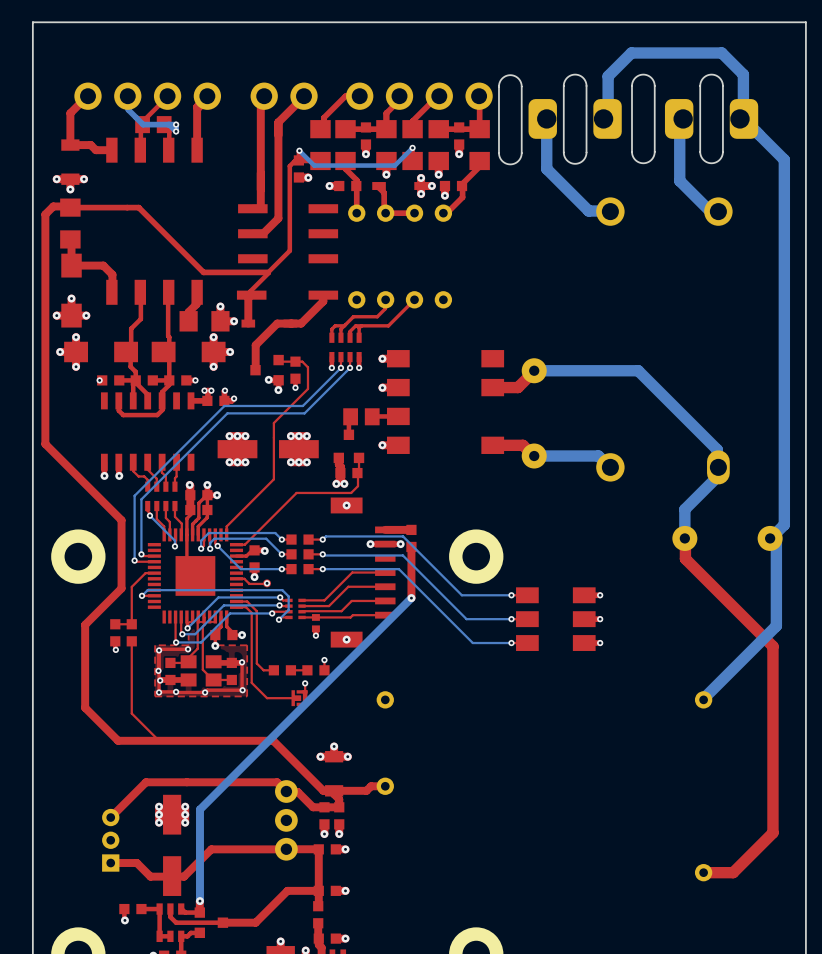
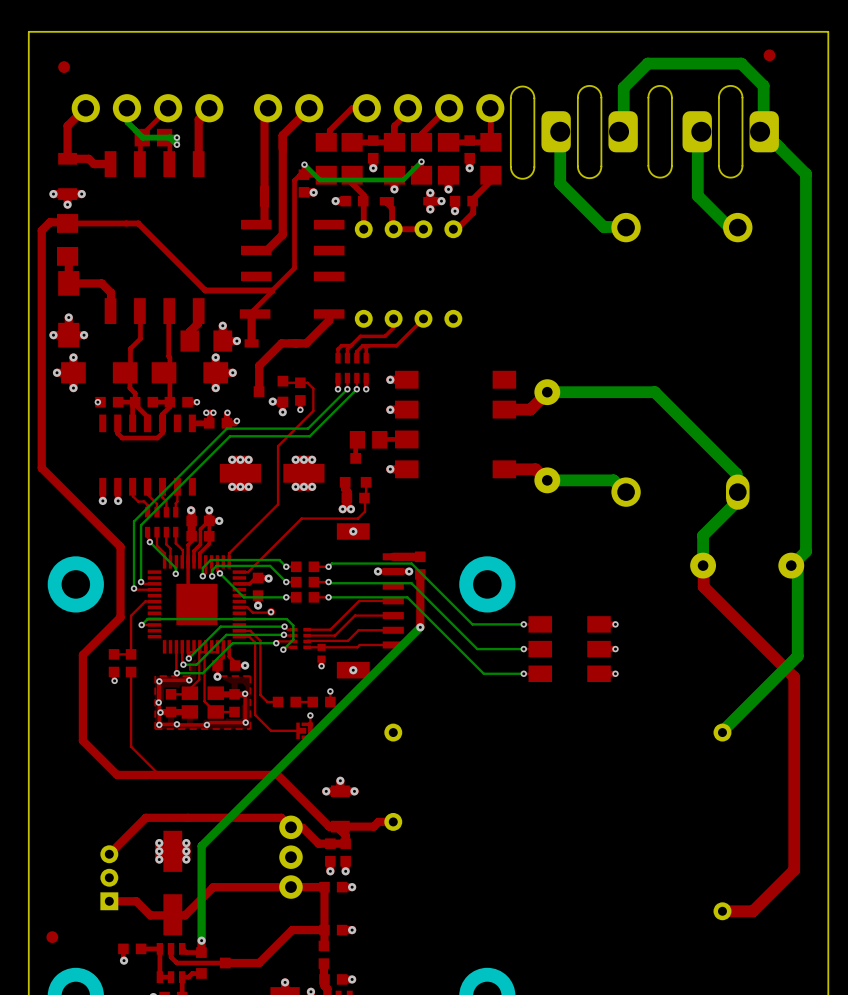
part: none -> (769, 55)
part: none -> (64, 67)
part: none -> (52, 937)

